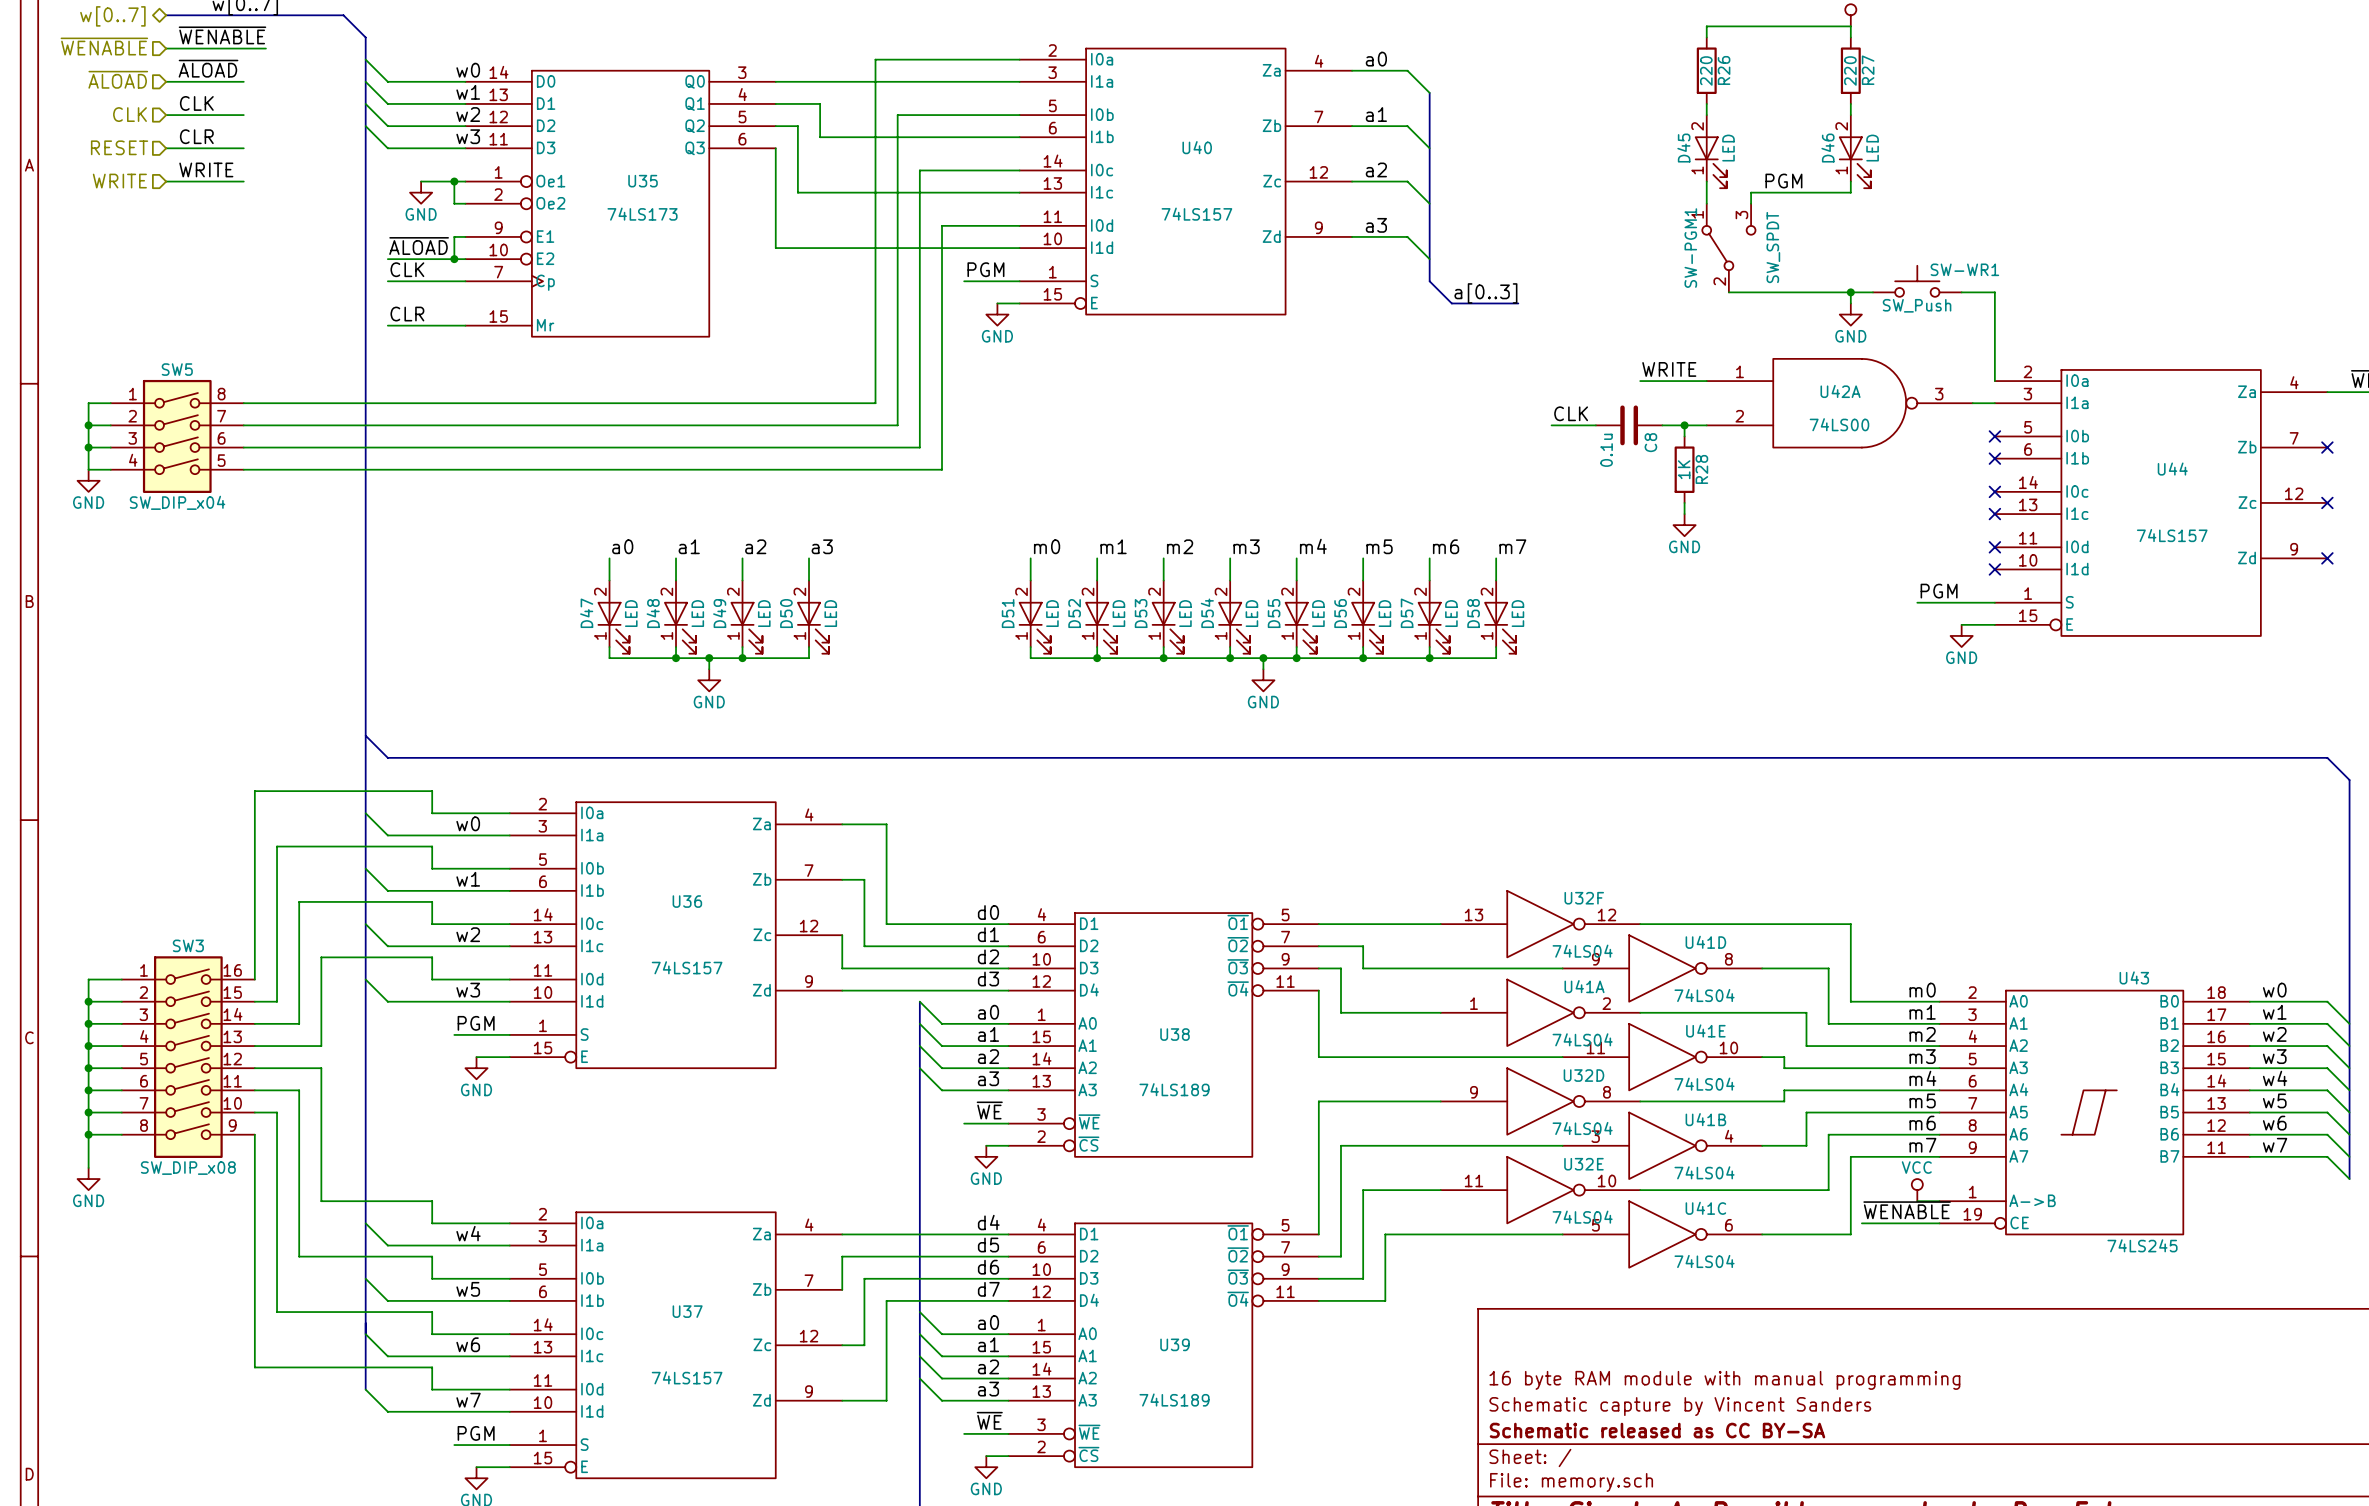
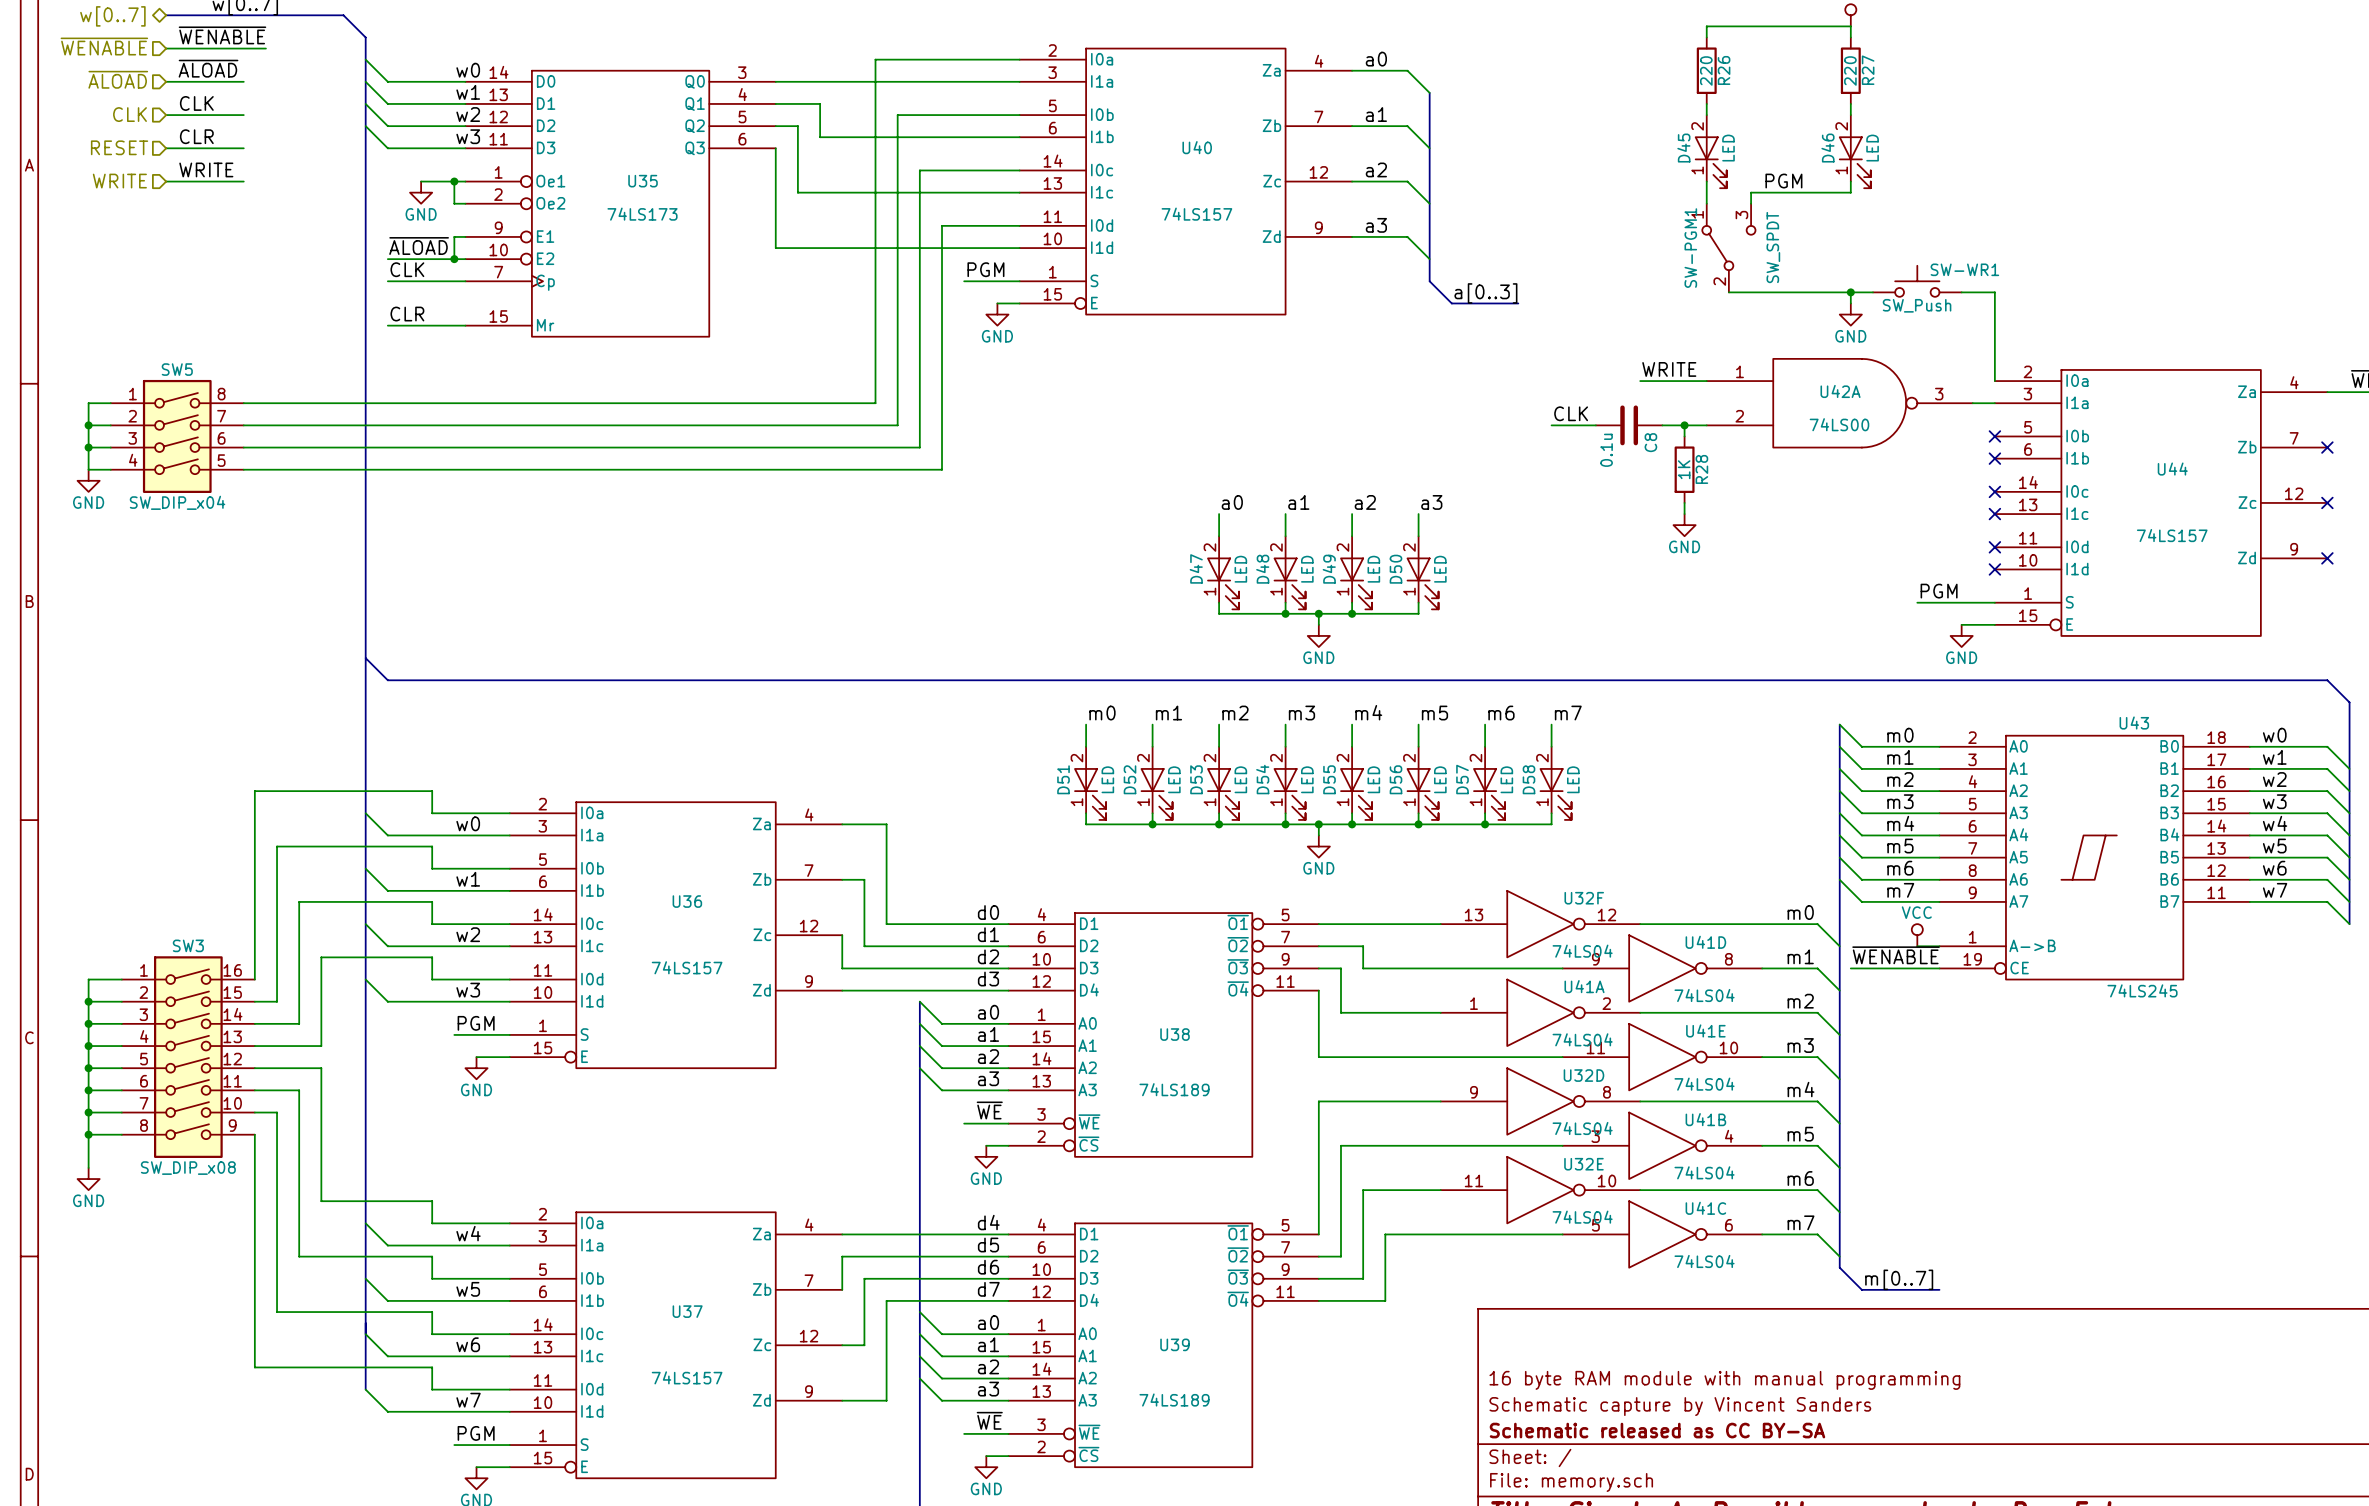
label: none -> a0 (1232, 502)
label: none -> a1 (1298, 502)
label: none -> a2 (1365, 502)
label: none -> a3 (1431, 502)
wire: none -> (1219, 514) (1219, 536)
wire: none -> (1285, 514) (1285, 536)
wire: none -> (1352, 514) (1352, 536)
wire: none -> (1418, 514) (1418, 536)
label: a0 (622, 546) -> none
label: a1 (689, 546) -> none
label: a2 (755, 546) -> none
label: a3 (822, 546) -> none
label position: m0 (1047, 546) -> m0 (1102, 713)
label position: m1 (1113, 546) -> m1 (1168, 713)
label position: m2 (1180, 546) -> m2 (1235, 713)
label position: m3 (1246, 546) -> m3 (1301, 713)
label position: m4 (1313, 546) -> m4 (1368, 712)
label position: m5 (1379, 546) -> m5 (1434, 713)
label position: m6 (1446, 546) -> m6 (1501, 713)
label position: m7 (1512, 546) -> m7 (1568, 713)
wire: (609, 558) (609, 580) -> none
wire: (676, 558) (676, 580) -> none
wire: (742, 558) (742, 580) -> none
wire: (809, 558) (809, 580) -> none
wire: (1030, 558) (1030, 580) -> (1086, 724) (1086, 746)
wire: (1097, 558) (1097, 580) -> (1152, 724) (1152, 746)
wire: (1163, 558) (1163, 580) -> (1219, 724) (1219, 746)
wire: (1230, 558) (1230, 580) -> (1285, 724) (1285, 746)
wire: (1296, 558) (1296, 580) -> (1352, 724) (1352, 746)
wire: (1363, 558) (1363, 580) -> (1418, 724) (1418, 746)
wire: (1429, 558) (1429, 580) -> (1485, 724) (1485, 746)
wire: (1496, 558) (1496, 580) -> (1551, 724) (1551, 746)
wire: none -> (1219, 602) (1219, 613) (1418, 613) (1418, 602)
wire: none -> (1285, 602) (1285, 613)
wire: none -> (1352, 602) (1352, 613)
junction: none -> (1285, 613)
wire: none -> (1318, 613) (1318, 624)
junction: none -> (1318, 613)
junction: none -> (1352, 613)
D47 position: (613, 617) -> (1223, 572)
D48 position: (680, 617) -> (1289, 572)
D49 position: (746, 617) -> (1356, 572)
D50 position: (813, 617) -> (1422, 572)
D51 position: (1034, 617) -> (1090, 783)
D52 position: (1101, 617) -> (1156, 783)
D53 position: (1167, 617) -> (1223, 783)
D54 position: (1234, 617) -> (1289, 783)
D55 position: (1300, 617) -> (1356, 783)
D56 position: (1367, 617) -> (1422, 783)
D57 position: (1433, 617) -> (1489, 783)
D58 position: (1500, 617) -> (1555, 783)
wire: (609, 647) (609, 658) (809, 658) (809, 647) -> none
wire: (676, 647) (676, 658) -> none
wire: (742, 647) (742, 658) -> none
wire: (1030, 647) (1030, 658) (1496, 658) (1496, 647) -> (1086, 813) (1086, 824) (1551, 824) (1551, 813)
wire: (1097, 647) (1097, 658) -> (1152, 813) (1152, 824)
wire: (1163, 647) (1163, 658) -> (1219, 813) (1219, 824)
wire: (1230, 647) (1230, 658) -> (1285, 813) (1285, 824)
wire: (1296, 647) (1296, 658) -> (1352, 813) (1352, 824)
wire: (1363, 647) (1363, 658) -> (1418, 813) (1418, 824)
wire: (1429, 647) (1429, 658) -> (1485, 813) (1485, 824)
junction: (676, 658) -> none
wire: (709, 658) (709, 669) -> none
junction: (709, 658) -> none
junction: (742, 658) -> none
junction: (1097, 658) -> none
junction: (1163, 658) -> none
junction: (1230, 658) -> none
wire: (1263, 658) (1263, 669) -> (1318, 824) (1318, 835)
junction: (1263, 658) -> none
junction: (1296, 658) -> none
junction: (1363, 658) -> none
junction: (1429, 658) -> none
power symbol: GND (709, 680) -> none
power symbol position: GND (1263, 680) -> GND (1318, 635)
wire: none -> (1839, 724) (1861, 746) (1939, 746)
bus: none -> (1839, 724) (1839, 1267) (1861, 1289) (1939, 1289)
bus: (365, 735) (387, 757) (2327, 757) (2349, 780) -> (365, 658) (387, 680) (2327, 680) (2349, 702) (2349, 780)
label: none -> m0 (1900, 735)
label: none -> w0 (2274, 735)
wire: none -> (1839, 746) (1861, 768) (1939, 768)
wire: none -> (2249, 746) (2327, 746) (2349, 768)
label: none -> m1 (1900, 757)
label: none -> w1 (2274, 757)
wire: none -> (1839, 768) (1861, 791) (1939, 791)
wire: none -> (2249, 768) (2327, 768) (2349, 791)
label: none -> m2 (1900, 779)
label: none -> w2 (2274, 779)
wire: none -> (1839, 791) (1861, 813) (1939, 813)
label: none -> m3 (1900, 801)
label: none -> w3 (2274, 801)
wire: none -> (1839, 813) (1861, 835) (1939, 835)
label: none -> m4 (1900, 823)
label: none -> w4 (2275, 823)
junction: none -> (1152, 824)
junction: none -> (1219, 824)
junction: none -> (1285, 824)
junction: none -> (1318, 824)
junction: none -> (1352, 824)
junction: none -> (1418, 824)
junction: none -> (1485, 824)
wire: none -> (1839, 835) (1861, 857) (1939, 857)
power symbol: none -> GND (1318, 846)
label: none -> m5 (1900, 846)
label: none -> w5 (2274, 846)
wire: none -> (1839, 857) (1861, 879) (1939, 879)
label: none -> m6 (1900, 868)
label: none -> w6 (2274, 868)
wire: none -> (1839, 879) (1861, 901) (1939, 901)
label: none -> m7 (1900, 890)
label: none -> w7 (2275, 890)
label: none -> m0 (1800, 912)
wire: (1817, 924) (1850, 924) (1850, 1001) (1939, 1001) -> (1817, 924) (1839, 946)
bus: (2349, 924) (2349, 1179) -> none
power symbol: none -> VCC (1917, 935)
wire: none -> (1917, 946) (1939, 946)
label: none -> ~{WENABLE} (1896, 955)
label: none -> m1 (1800, 956)
wire: (1817, 968) (1828, 968) (1828, 1023) (1939, 1023) -> (1817, 968) (1839, 990)
wire: none -> (1850, 968) (1939, 968)
label: m0 (1922, 990) -> none
label: w0 (2274, 990) -> none
wire: (2249, 1001) (2327, 1001) (2349, 1023) -> (2249, 791) (2327, 791) (2349, 813)
wire: (1806, 1012) (1806, 1046) (1939, 1046) -> (1806, 1012) (1817, 1012) (1839, 1034)
label: m1 (1922, 1012) -> none
label: w1 (2274, 1012) -> none
wire: (2249, 1023) (2327, 1023) (2349, 1046) -> (2249, 813) (2327, 813) (2349, 835)
label position: m2 (1922, 1034) -> m2 (1800, 1001)
label: w2 (2274, 1034) -> none
wire: (2249, 1046) (2327, 1046) (2349, 1068) -> (2249, 835) (2327, 835) (2349, 857)
label position: m3 (1922, 1056) -> m3 (1800, 1045)
label: w3 (2274, 1056) -> none
wire: (1784, 1057) (1784, 1068) (1939, 1068) -> (1784, 1057) (1817, 1057) (1839, 1079)
wire: (2249, 1068) (2327, 1068) (2349, 1090) -> (2249, 857) (2327, 857) (2349, 879)
label position: m4 (1922, 1078) -> m4 (1801, 1089)
label: w4 (2275, 1078) -> none
wire: (1939, 1090) (1784, 1090) (1784, 1101) -> (1839, 1123) (1817, 1101) (1784, 1101)
wire: (2249, 1090) (2327, 1090) (2349, 1112) -> (2249, 879) (2327, 879) (2349, 901)
label position: m5 (1922, 1100) -> m5 (1800, 1134)
label: w5 (2274, 1100) -> none
wire: (1939, 1112) (1806, 1112) (1806, 1145) -> (1839, 1167) (1817, 1145) (1806, 1145)
U43 position: (2094, 1112) -> (2094, 857)
wire: (2249, 1112) (2327, 1112) (2349, 1134) -> (2249, 901) (2327, 901) (2349, 924)
label: m6 (1922, 1123) -> none
label: w6 (2274, 1123) -> none
wire: (1939, 1134) (1828, 1134) (1828, 1190) (1817, 1190) -> (1839, 1212) (1817, 1190)
wire: (2249, 1134) (2327, 1134) (2349, 1156) -> none
label: m7 (1922, 1145) -> none
label: w7 (2275, 1145) -> none
wire: (1939, 1156) (1850, 1156) (1850, 1234) (1817, 1234) -> (1839, 1256) (1817, 1234)
wire: (2249, 1156) (2327, 1156) (2349, 1179) -> none
label: none -> m6 (1800, 1178)
power symbol: VCC (1917, 1190) -> none
wire: (1917, 1201) (1939, 1201) -> none
label: ~{WENABLE} (1907, 1210) -> none
label: none -> m7 (1801, 1222)
wire: (1861, 1223) (1939, 1223) -> none
label: none -> m[0..7] (1899, 1279)

